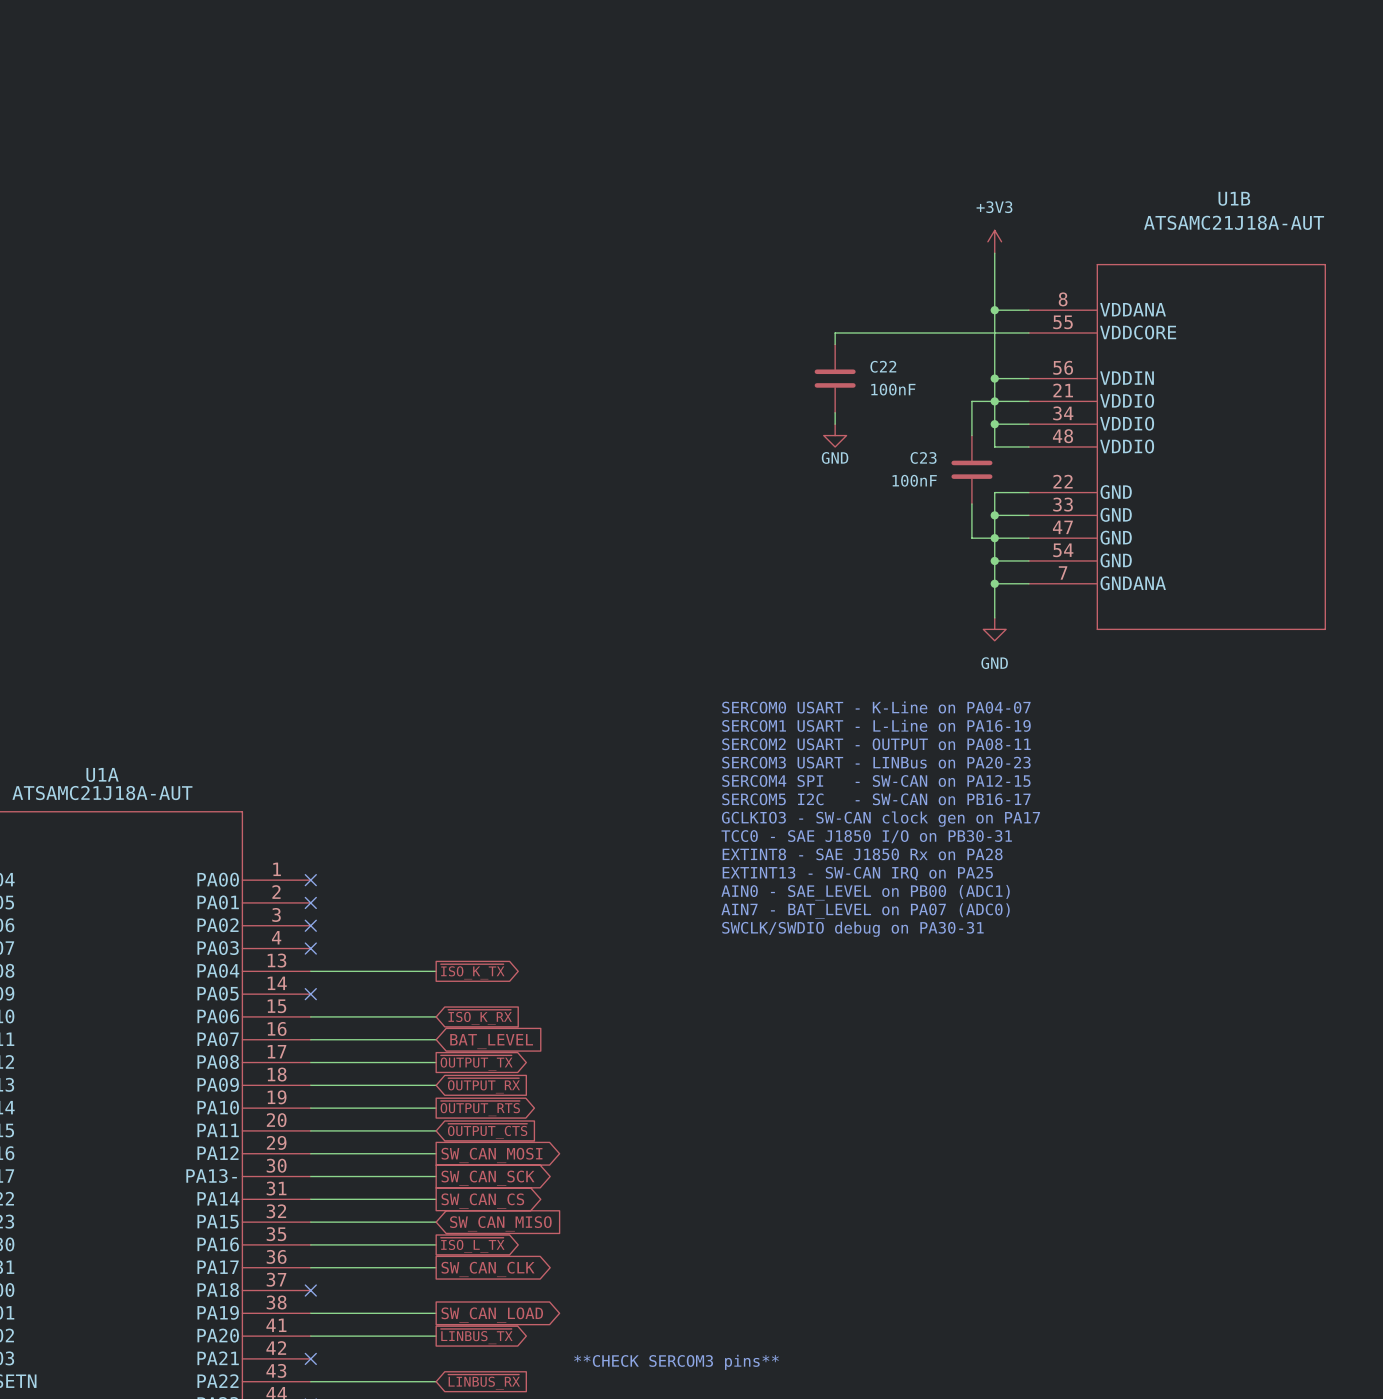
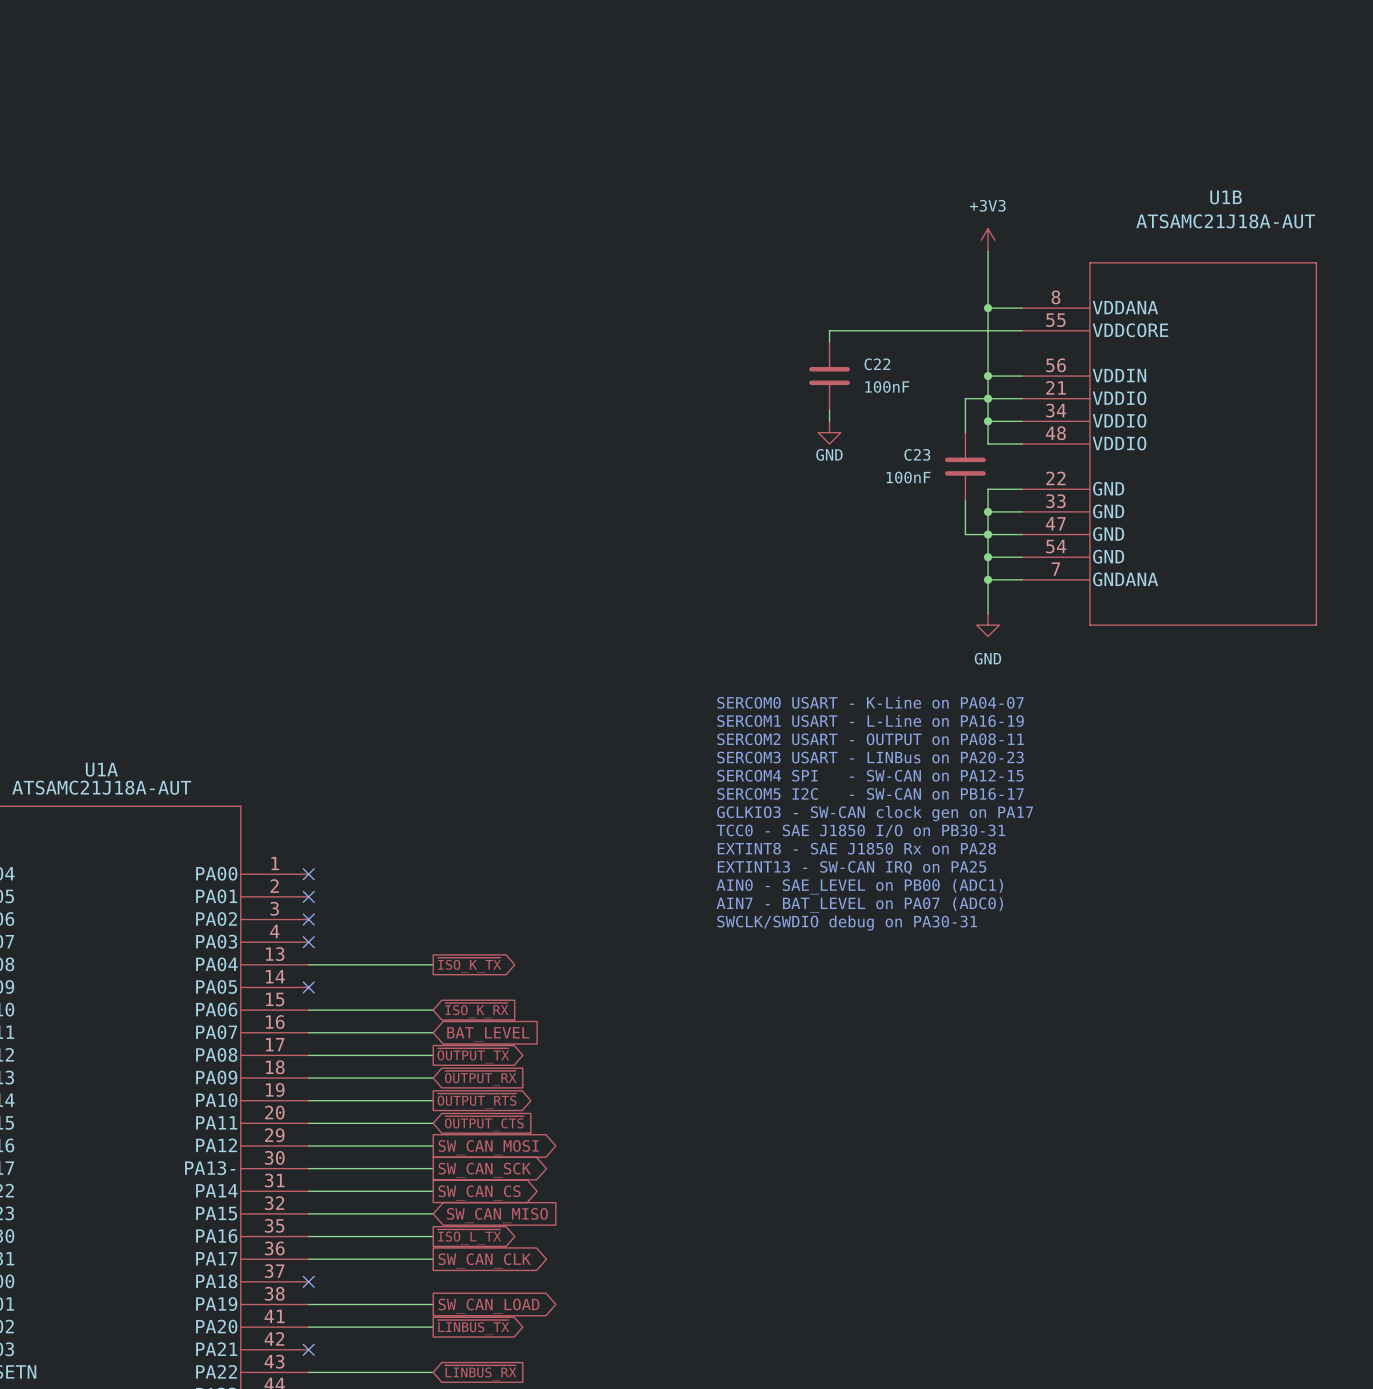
text: **CHECK SERCOM3 pins** (676, 1362) -> none

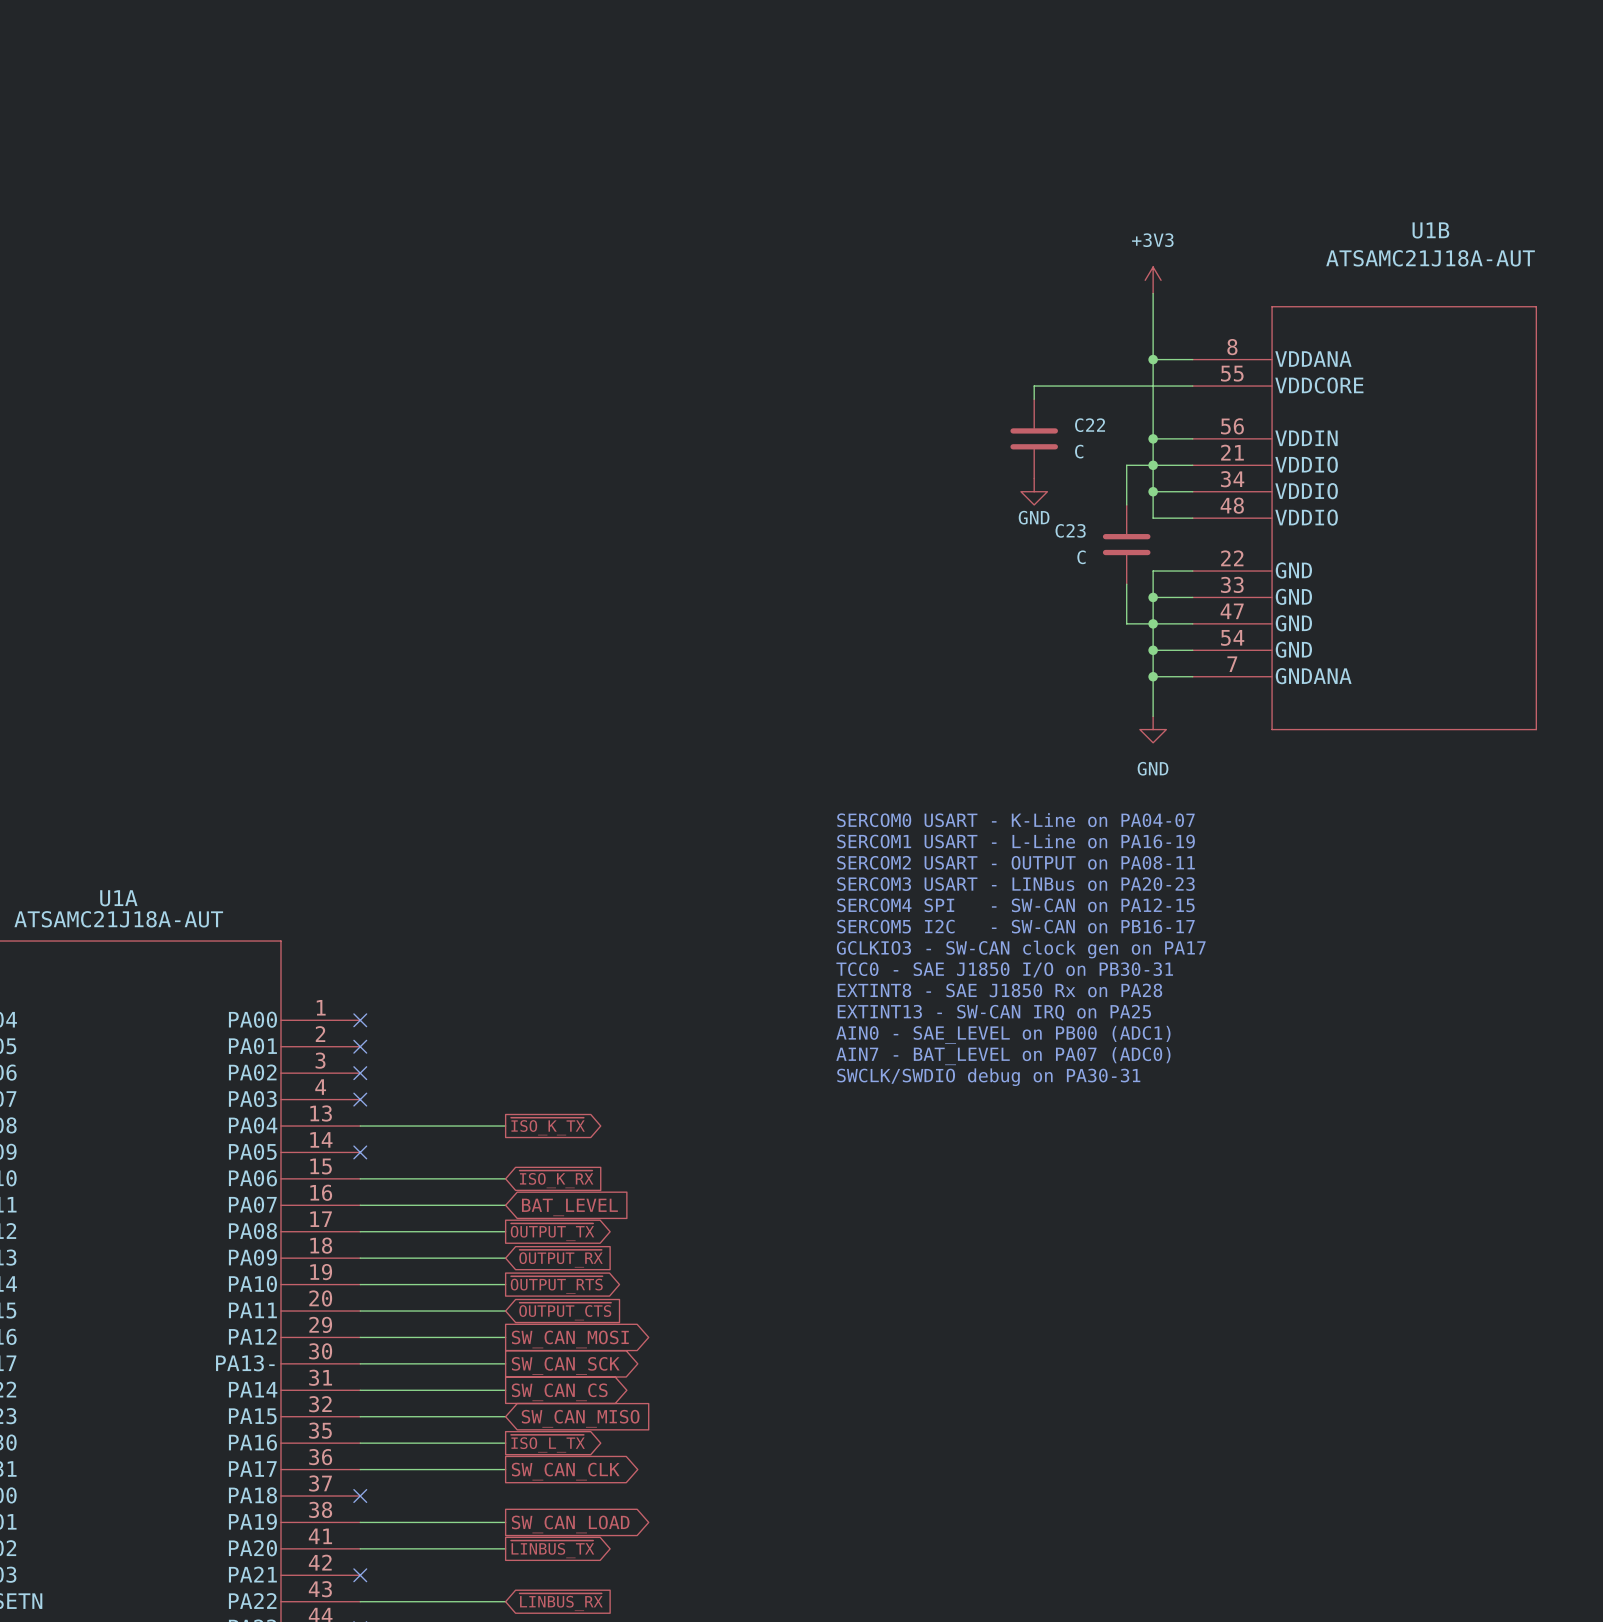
wire: (886, 330) (829, 330) (829, 342) -> (1034, 386) (1034, 399)
C22 position: (829, 376) -> (1034, 438)
C22 value: 100nF (887, 386) -> C (1079, 451)
wire: (829, 410) (829, 421) -> none
power symbol position: GND (829, 432) -> GND (1034, 491)
C23 value: 100nF (908, 477) -> C (1081, 557)

